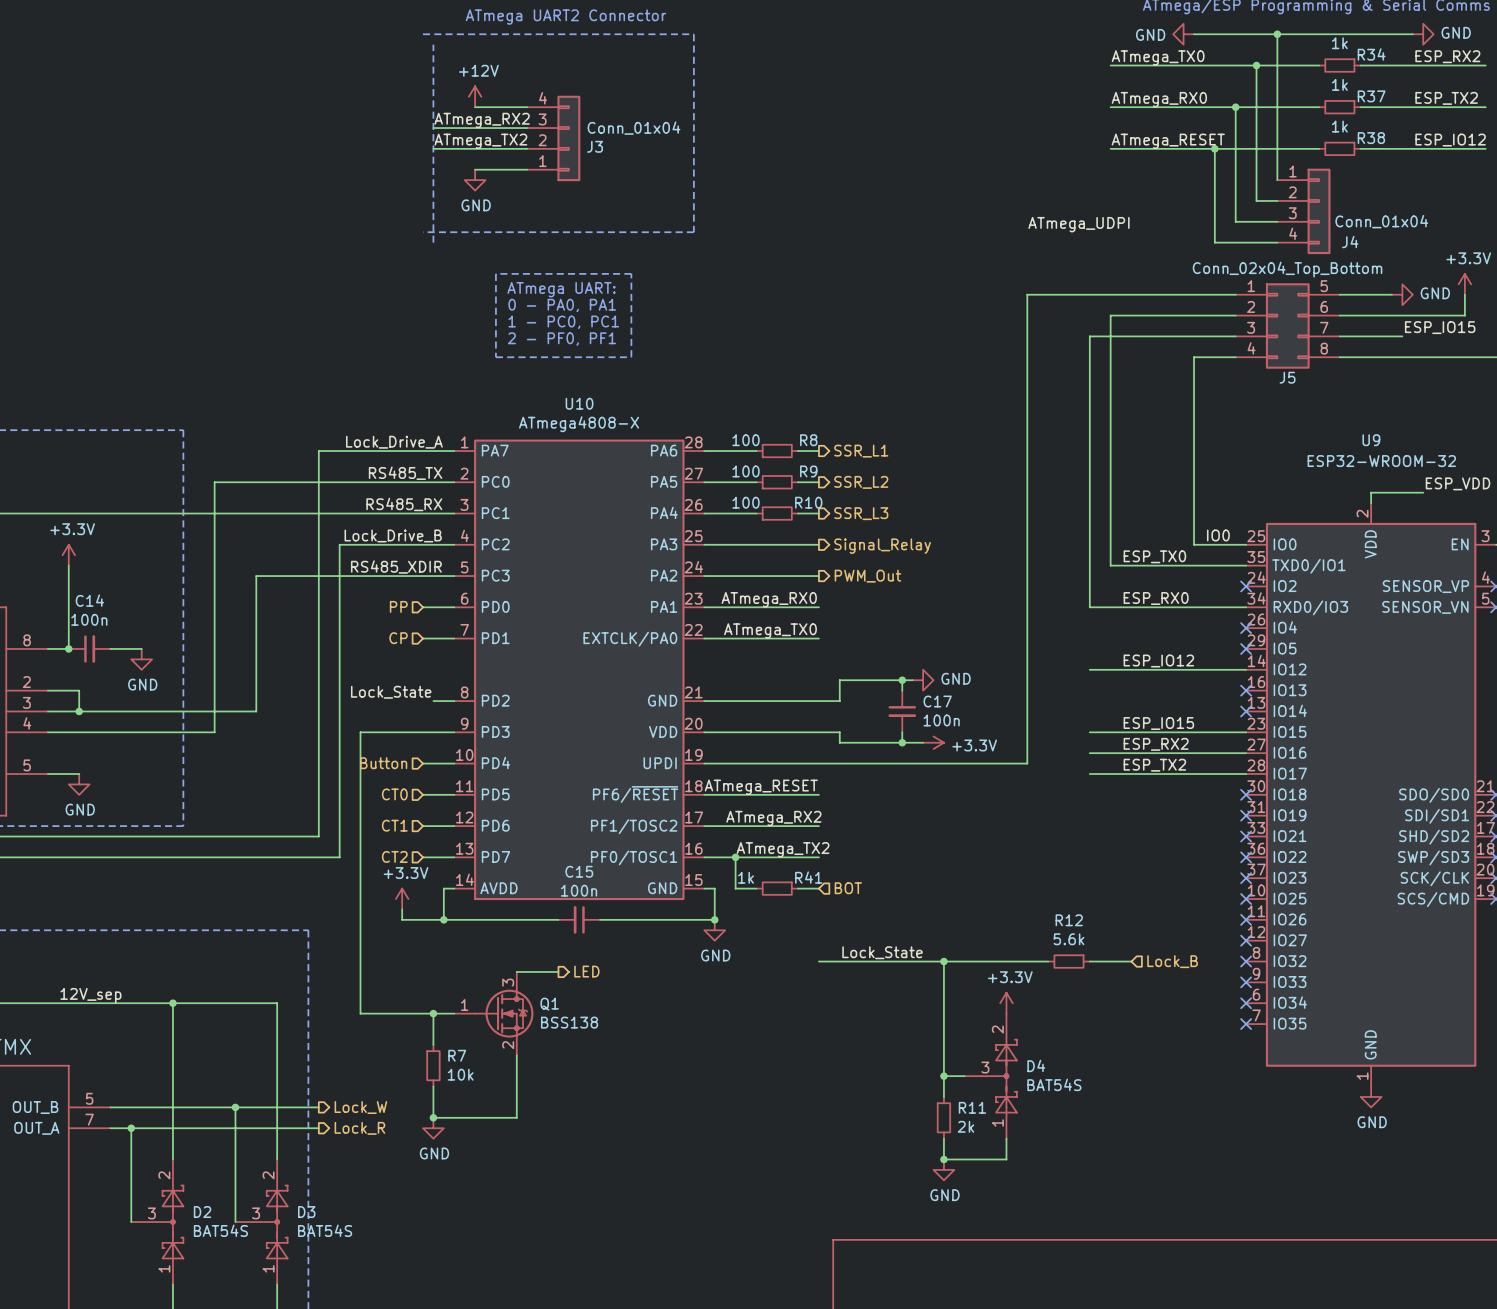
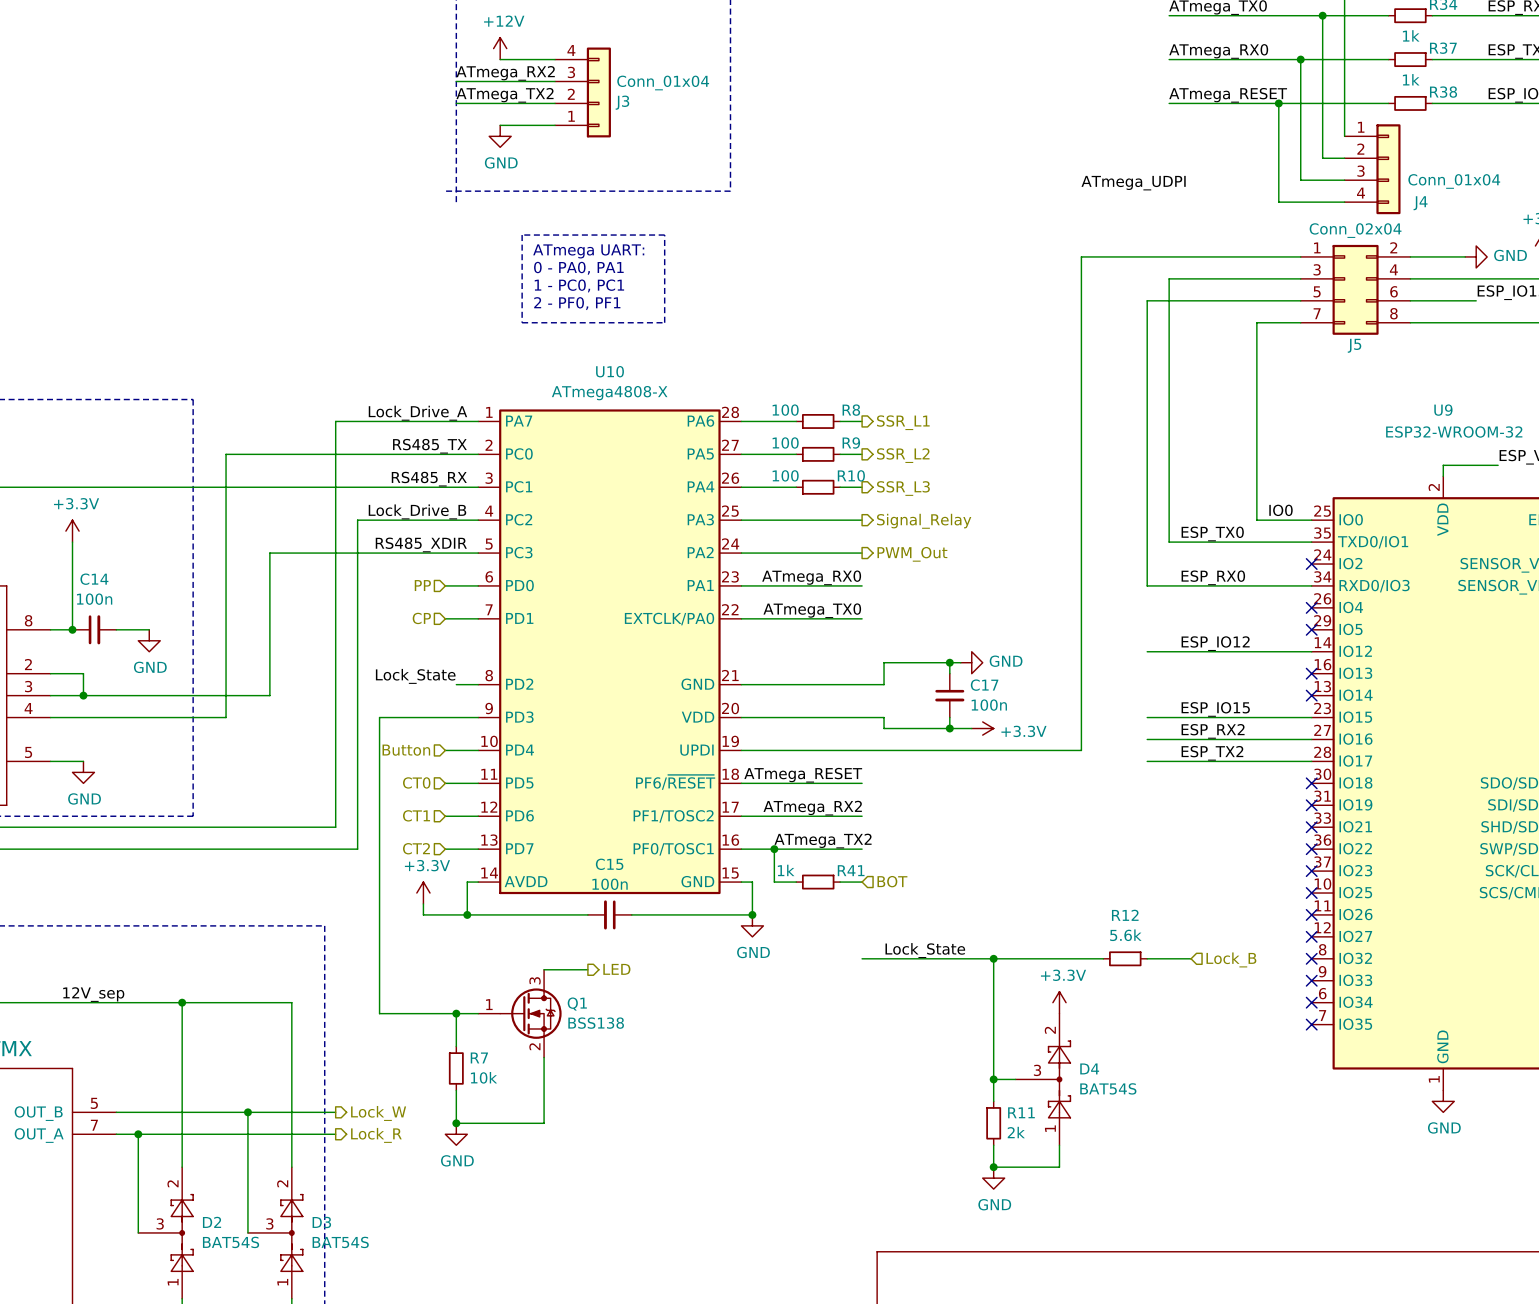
J5 value: Conn_02x04_Top_Bottom (1287, 269) -> Conn_02x04 (1355, 230)
J5 pin number: 5 (1324, 286) -> 2 (1393, 247)
J5 pin number: 2 (1251, 306) -> 3 (1317, 269)
J5 pin number: 6 (1324, 306) -> 4 (1393, 269)
J5 pin number: 3 (1251, 327) -> 5 (1317, 291)
J5 pin number: 7 (1324, 327) -> 6 (1394, 291)
J5 pin number: 4 (1251, 348) -> 7 (1317, 313)

